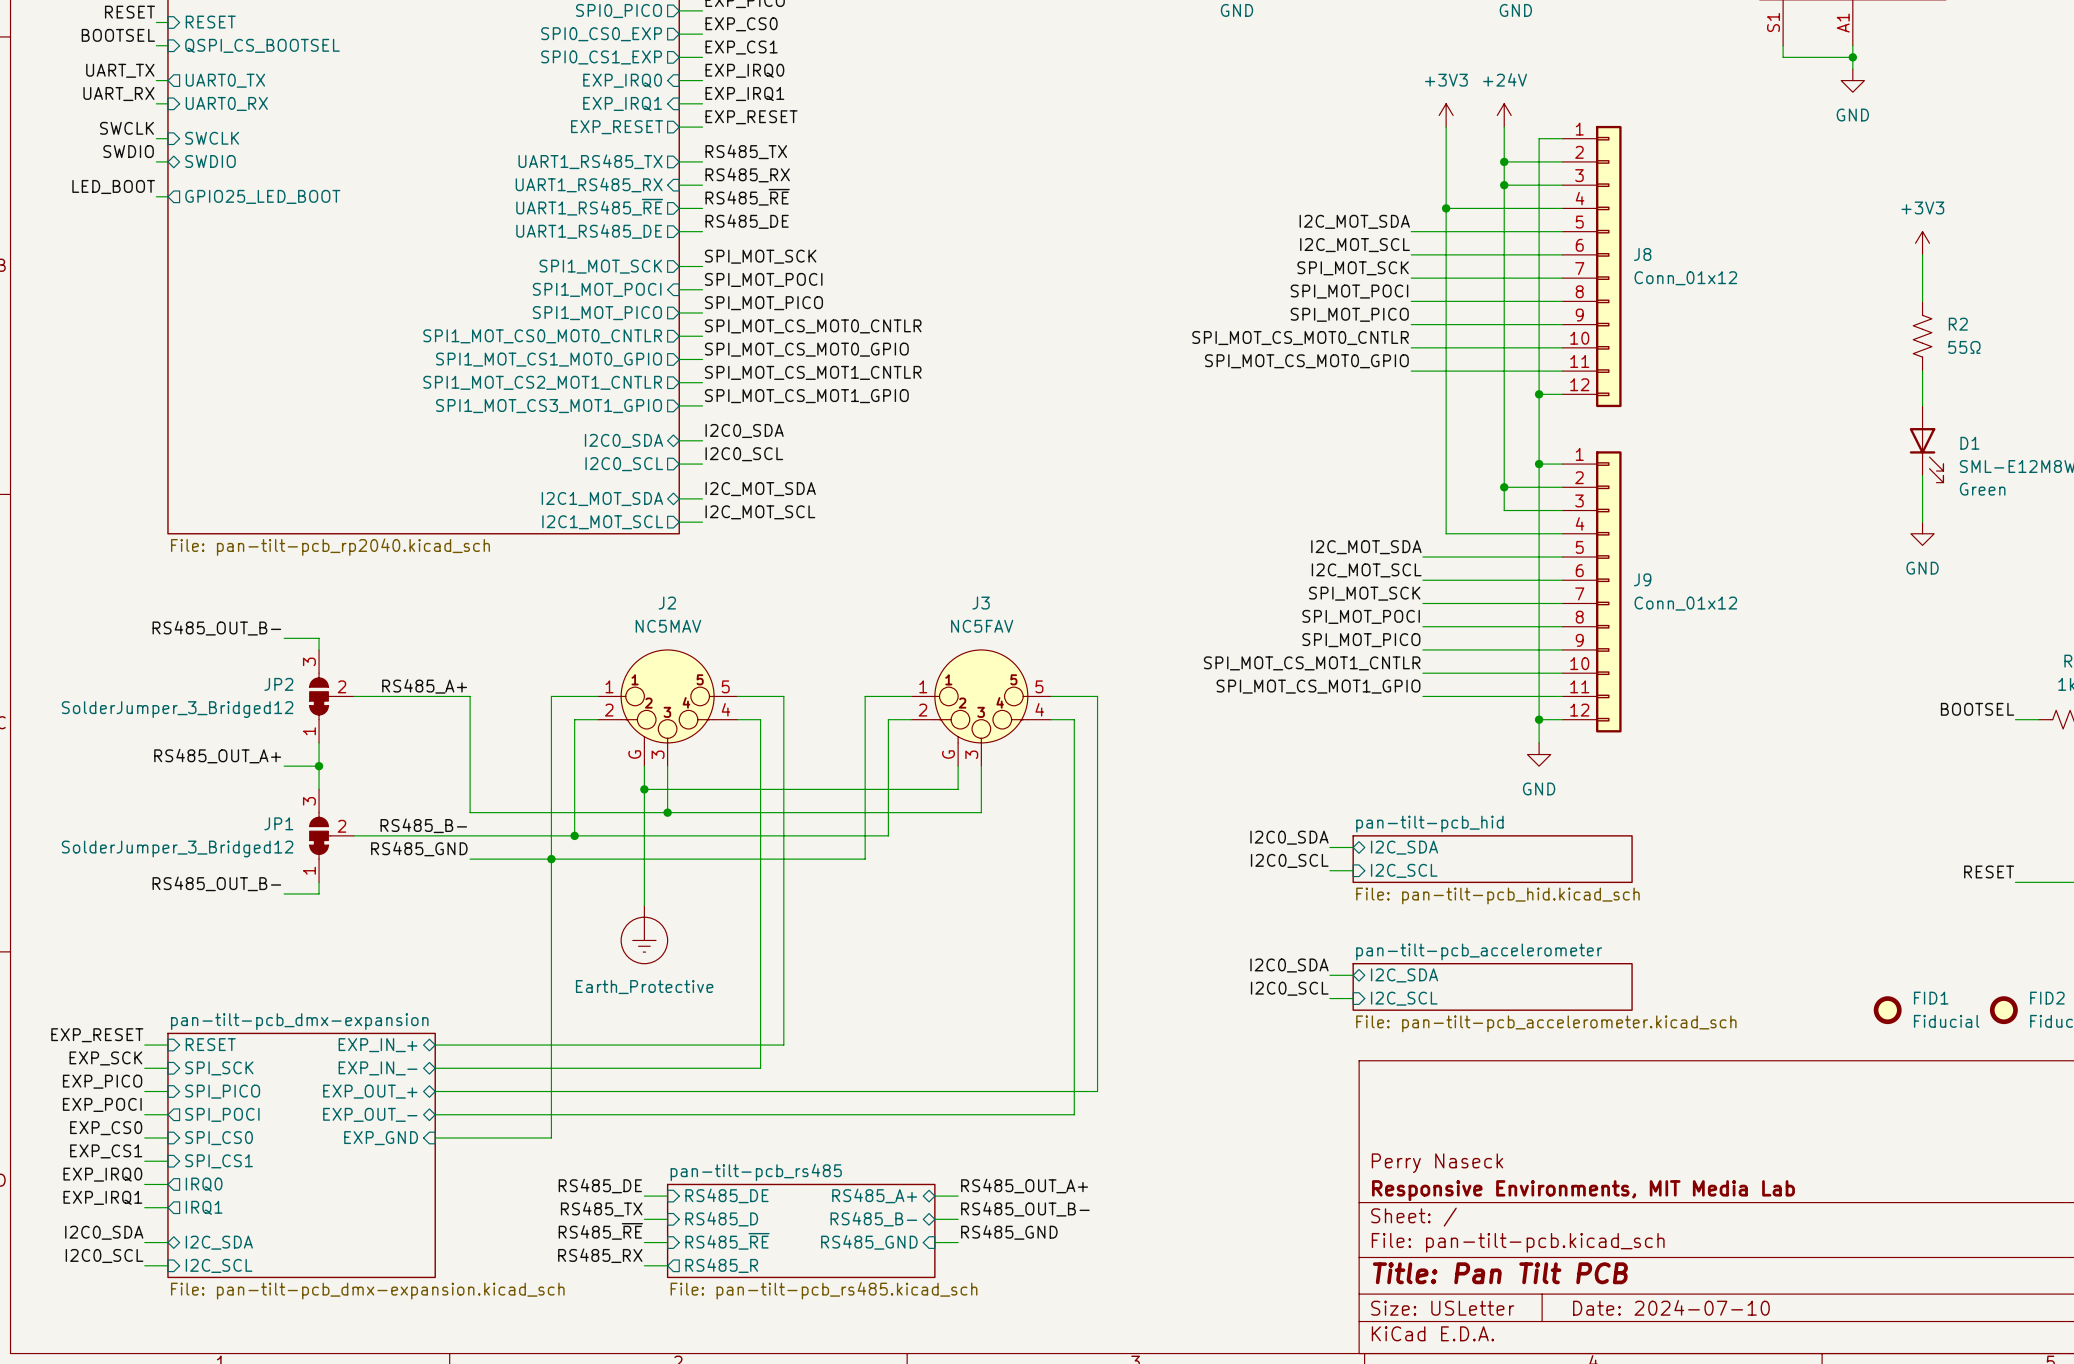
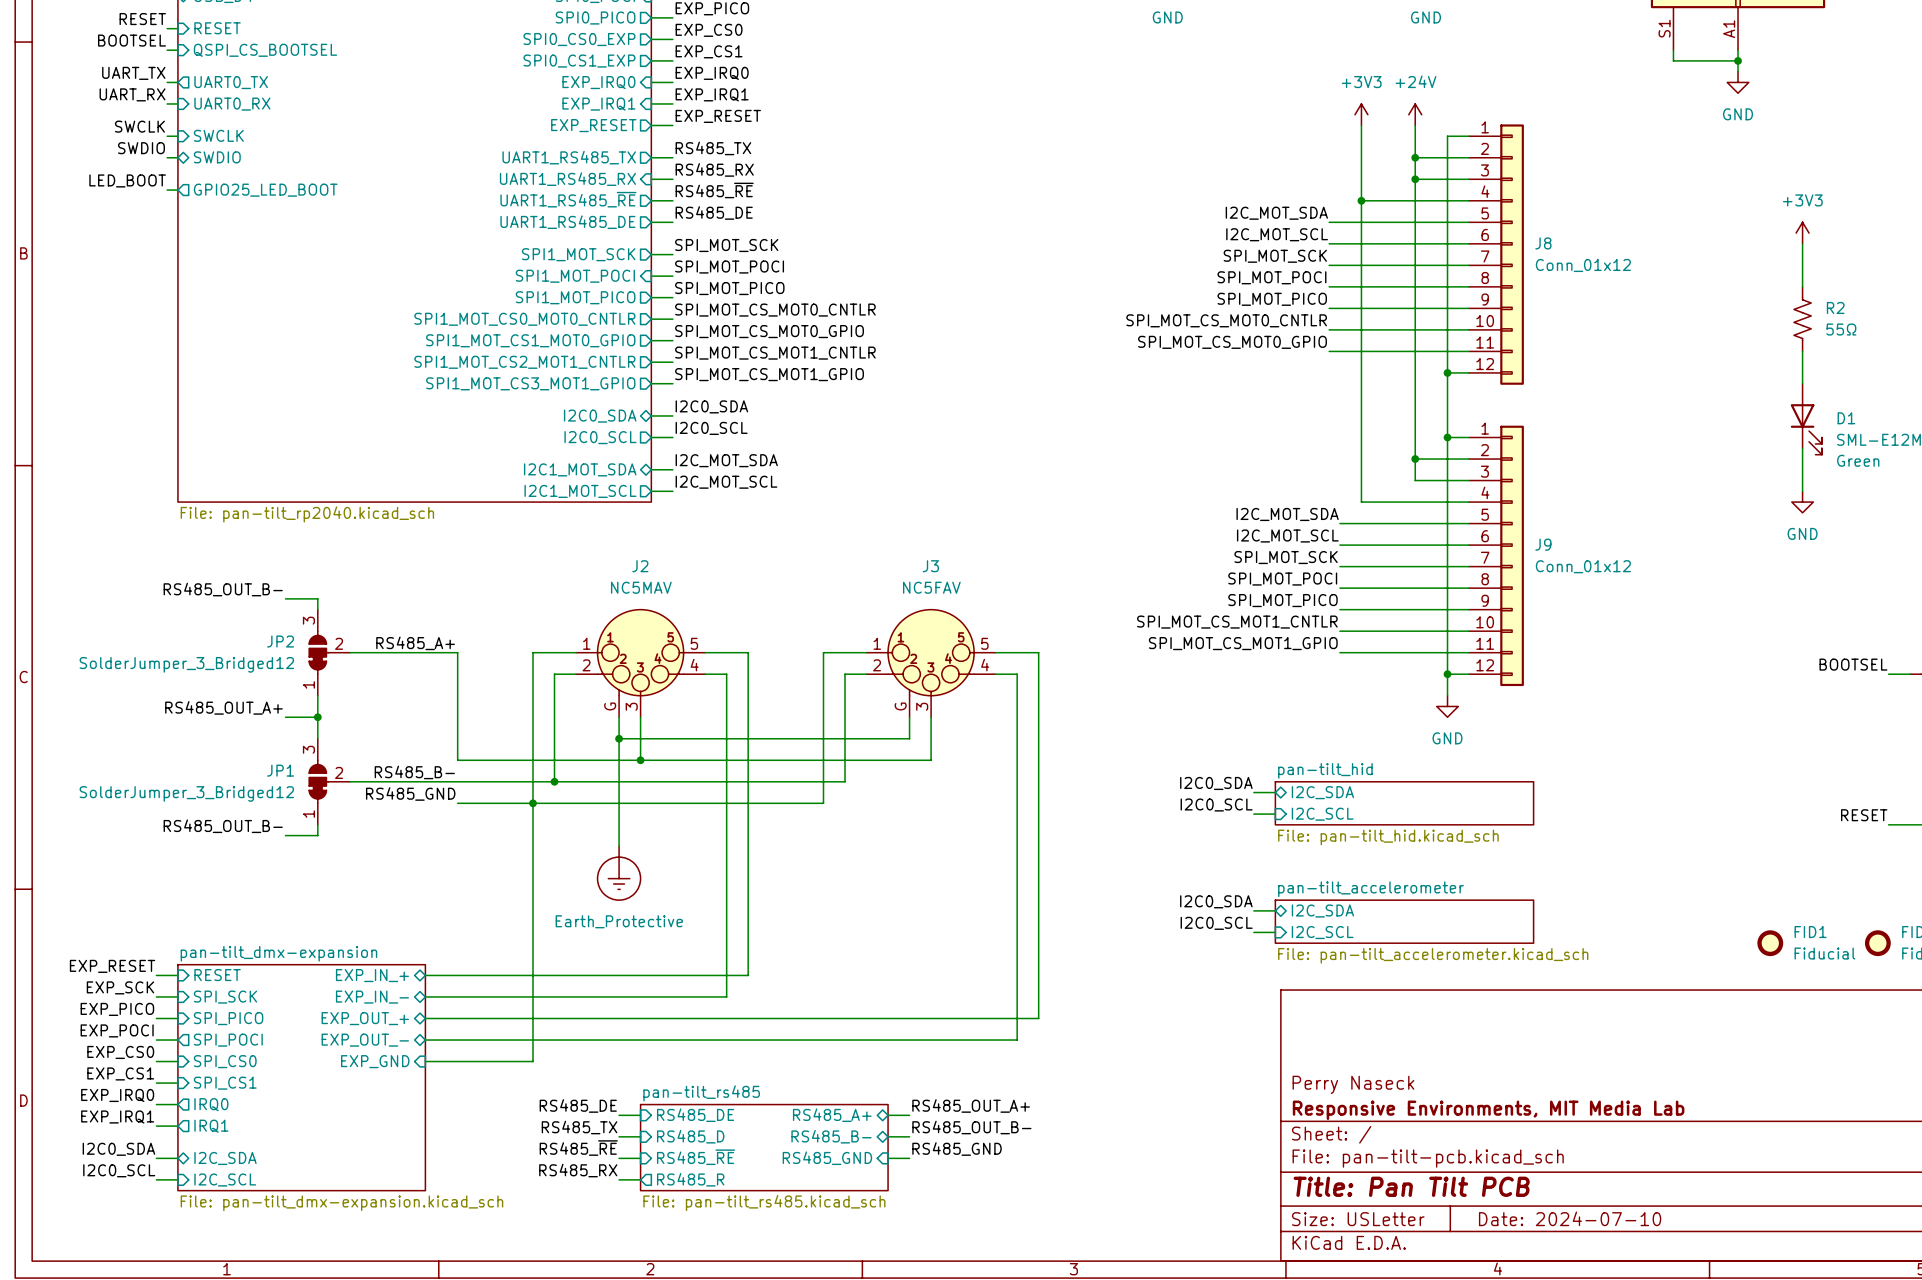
sheet value: File: pan-tilt-pcb_rp2040.kicad_sch (330, 547) -> File: pan-tilt_rp2040.kicad_sch (307, 514)
sheet pan-tilt-pcb_hid name: pan-tilt-pcb_hid (1429, 824) -> pan-tilt_hid (1325, 770)
sheet pan-tilt-pcb_hid value: File: pan-tilt-pcb_hid.kicad_sch (1497, 896) -> File: pan-tilt_hid.kicad_sch (1388, 837)
sheet pan-tilt-pcb_accelerometer name: pan-tilt-pcb_accelerometer (1479, 951) -> pan-tilt_accelerometer (1371, 889)
sheet pan-tilt-pcb_dmx-expansion name: pan-tilt-pcb_dmx-expansion (299, 1021) -> pan-tilt_dmx-expansion (278, 953)
sheet pan-tilt-pcb_accelerometer value: File: pan-tilt-pcb_accelerometer.kicad_sch (1546, 1023) -> File: pan-tilt_accelerometer.kicad_sch (1433, 955)
sheet pan-tilt-pcb_rs485 name: pan-tilt-pcb_rs485 (756, 1172) -> pan-tilt_rs485 (701, 1093)
sheet pan-tilt-pcb_rs485 value: File: pan-tilt-pcb_rs485.kicad_sch (824, 1290) -> File: pan-tilt_rs485.kicad_sch (764, 1203)
sheet pan-tilt-pcb_dmx-expansion value: File: pan-tilt-pcb_dmx-expansion.kicad_sch (367, 1291) -> File: pan-tilt_dmx-expansion.kicad_sch (341, 1203)

